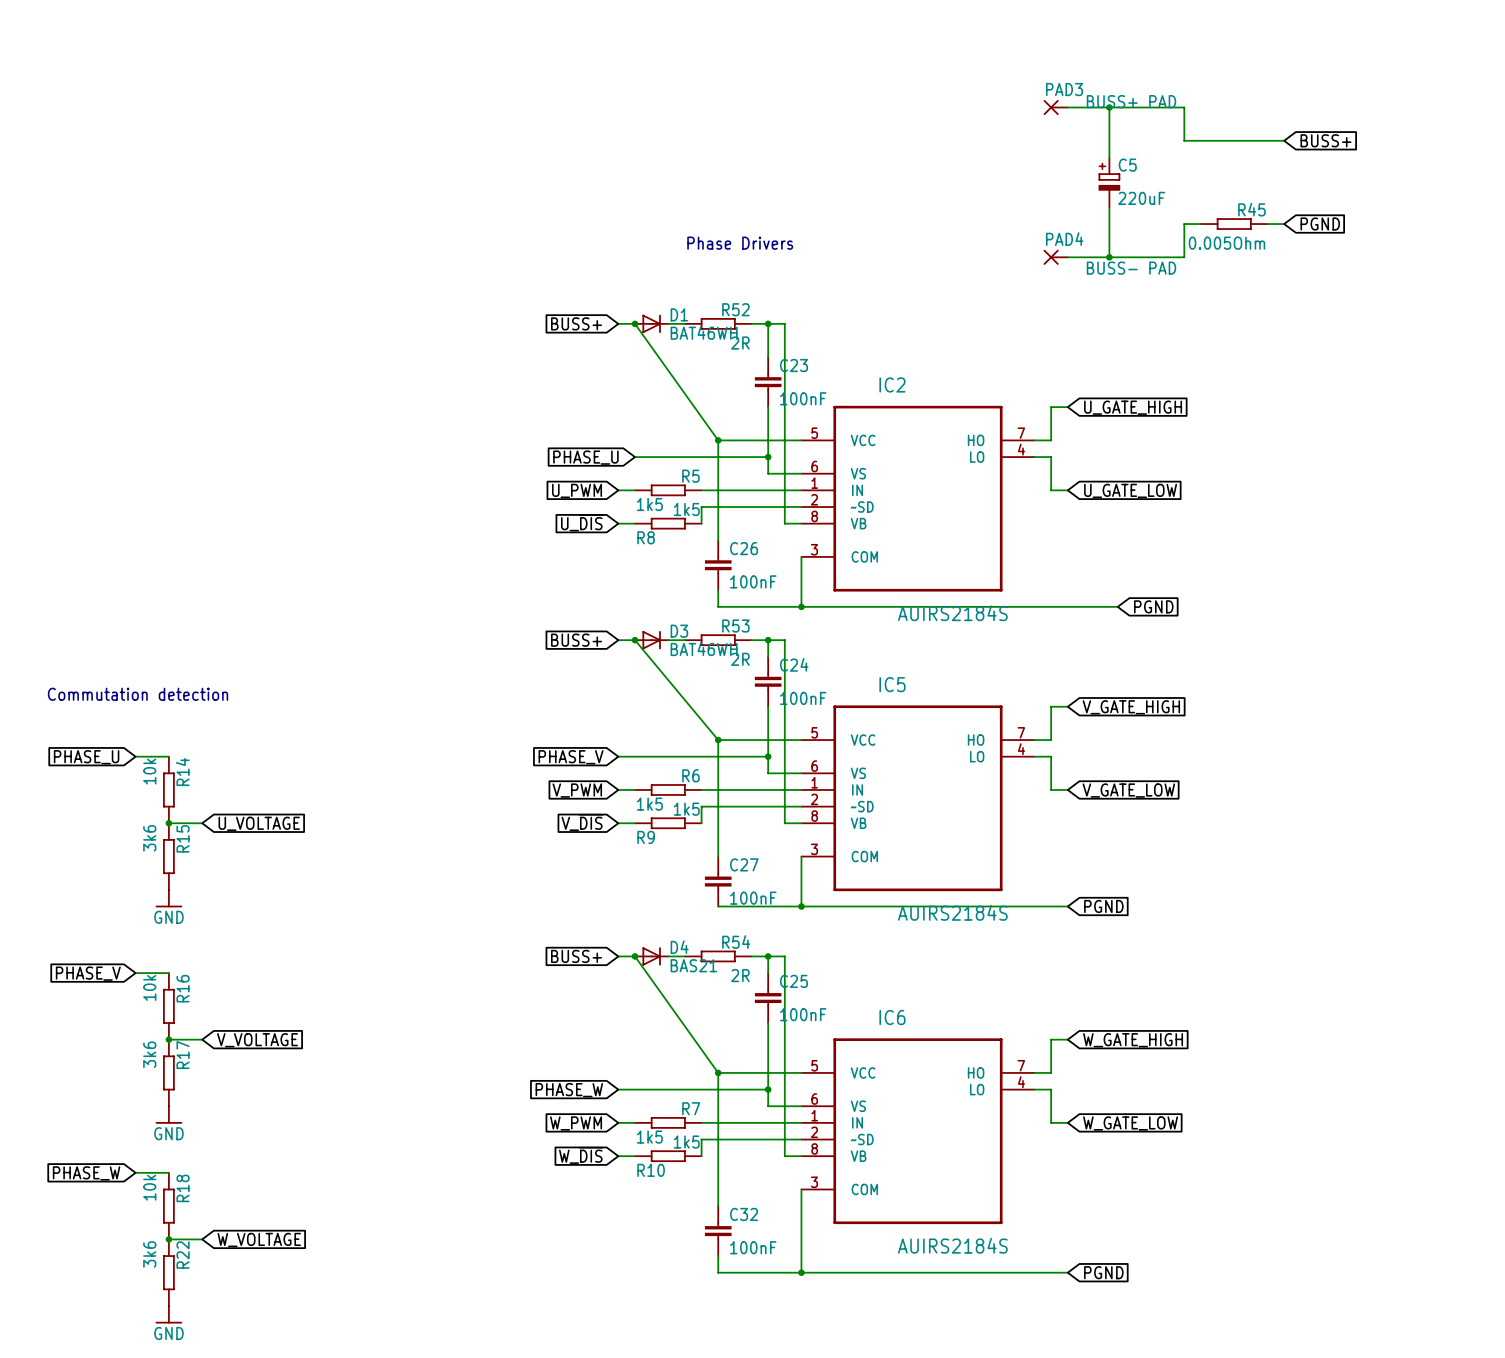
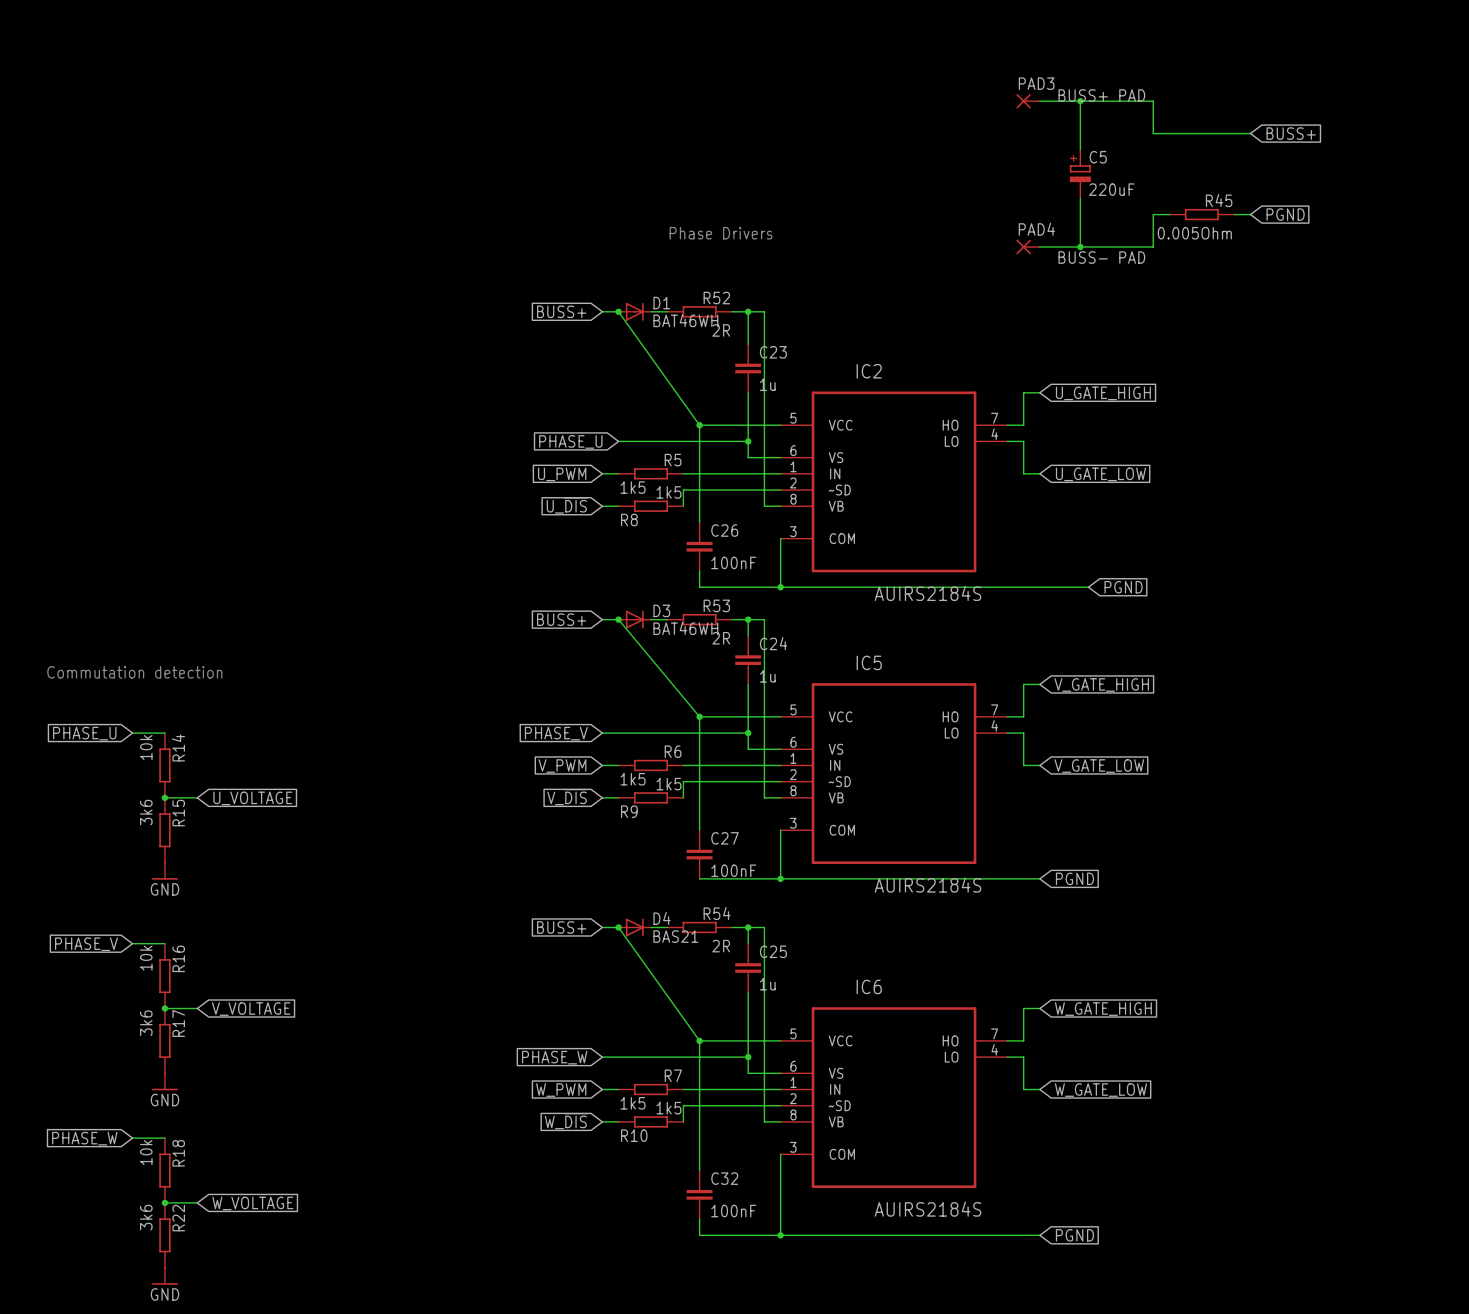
C23 value: 100nF (803, 398) -> 1u (767, 384)
C24 value: 100nF (803, 698) -> 1u (767, 676)
C25 value: 100nF (803, 1014) -> 1u (767, 984)

